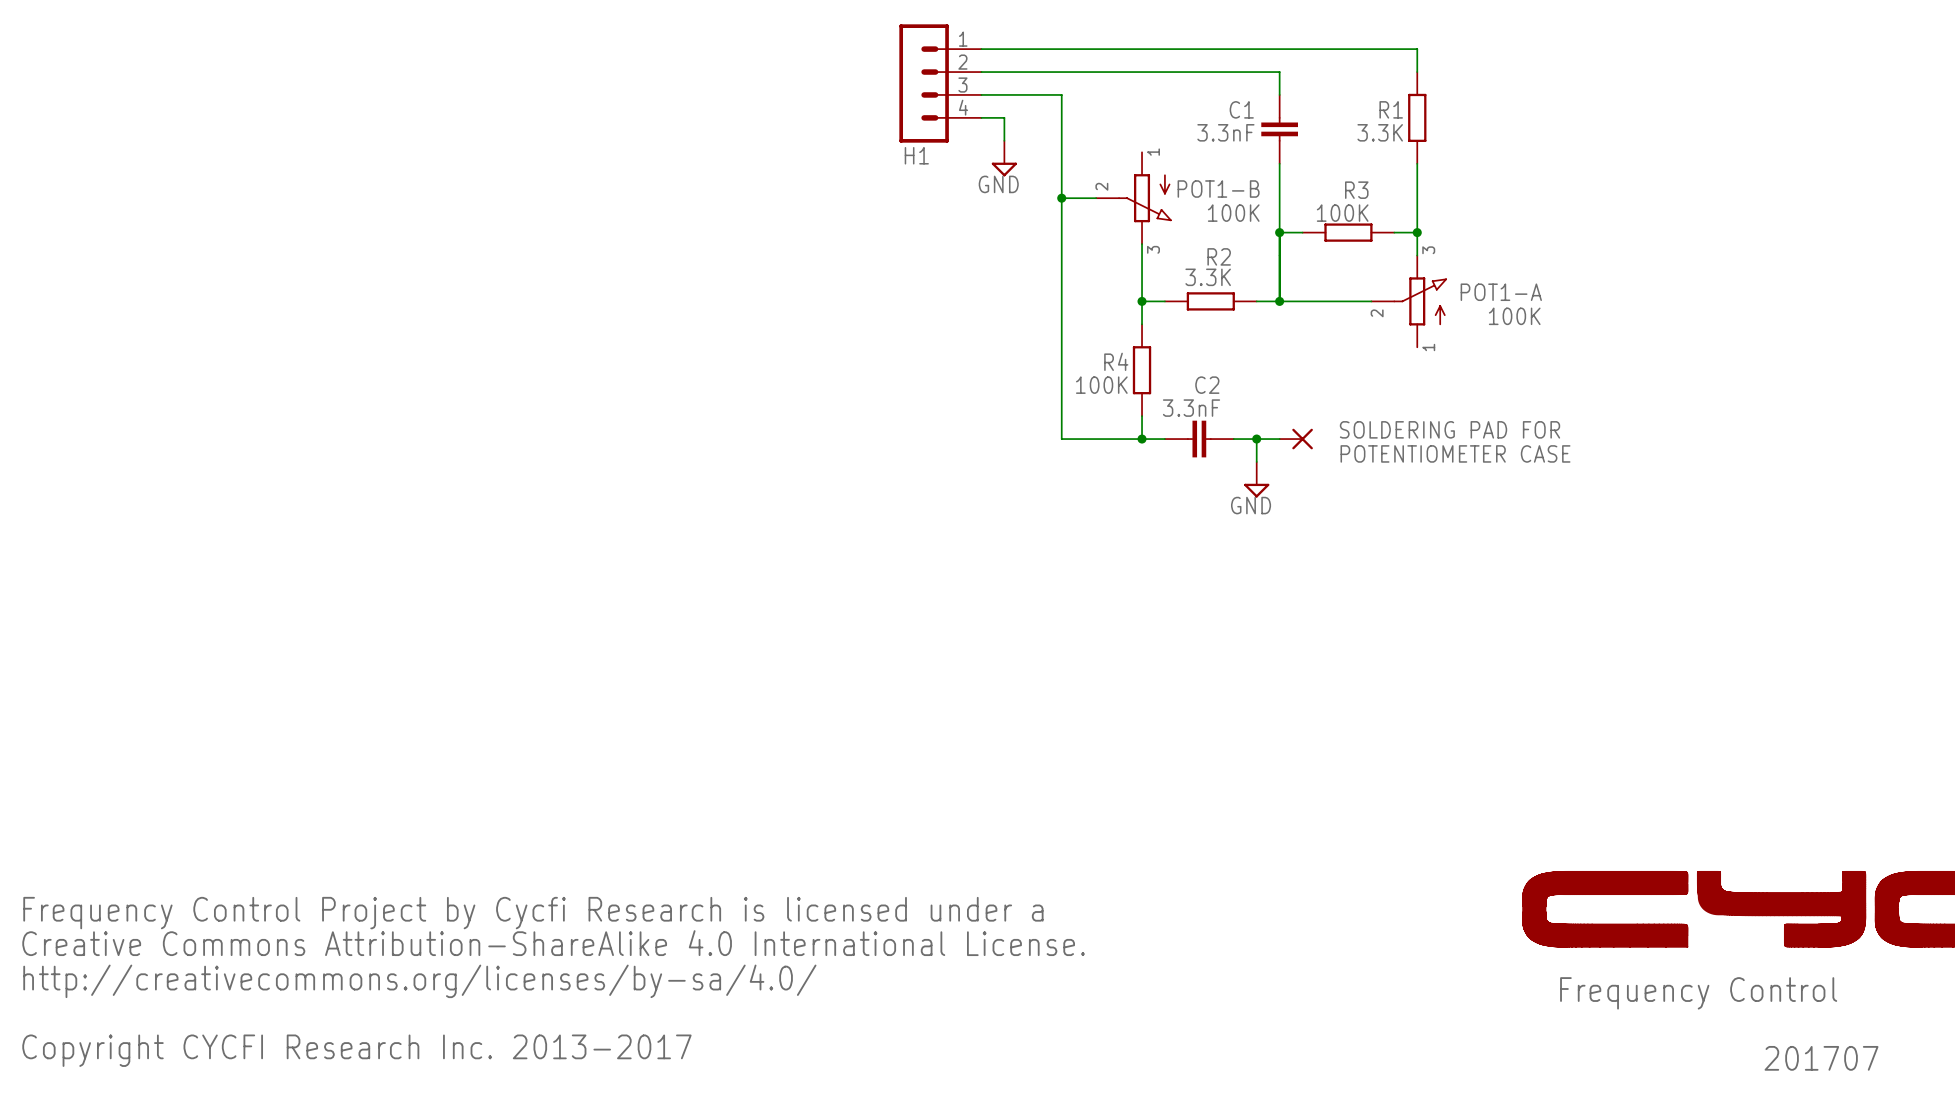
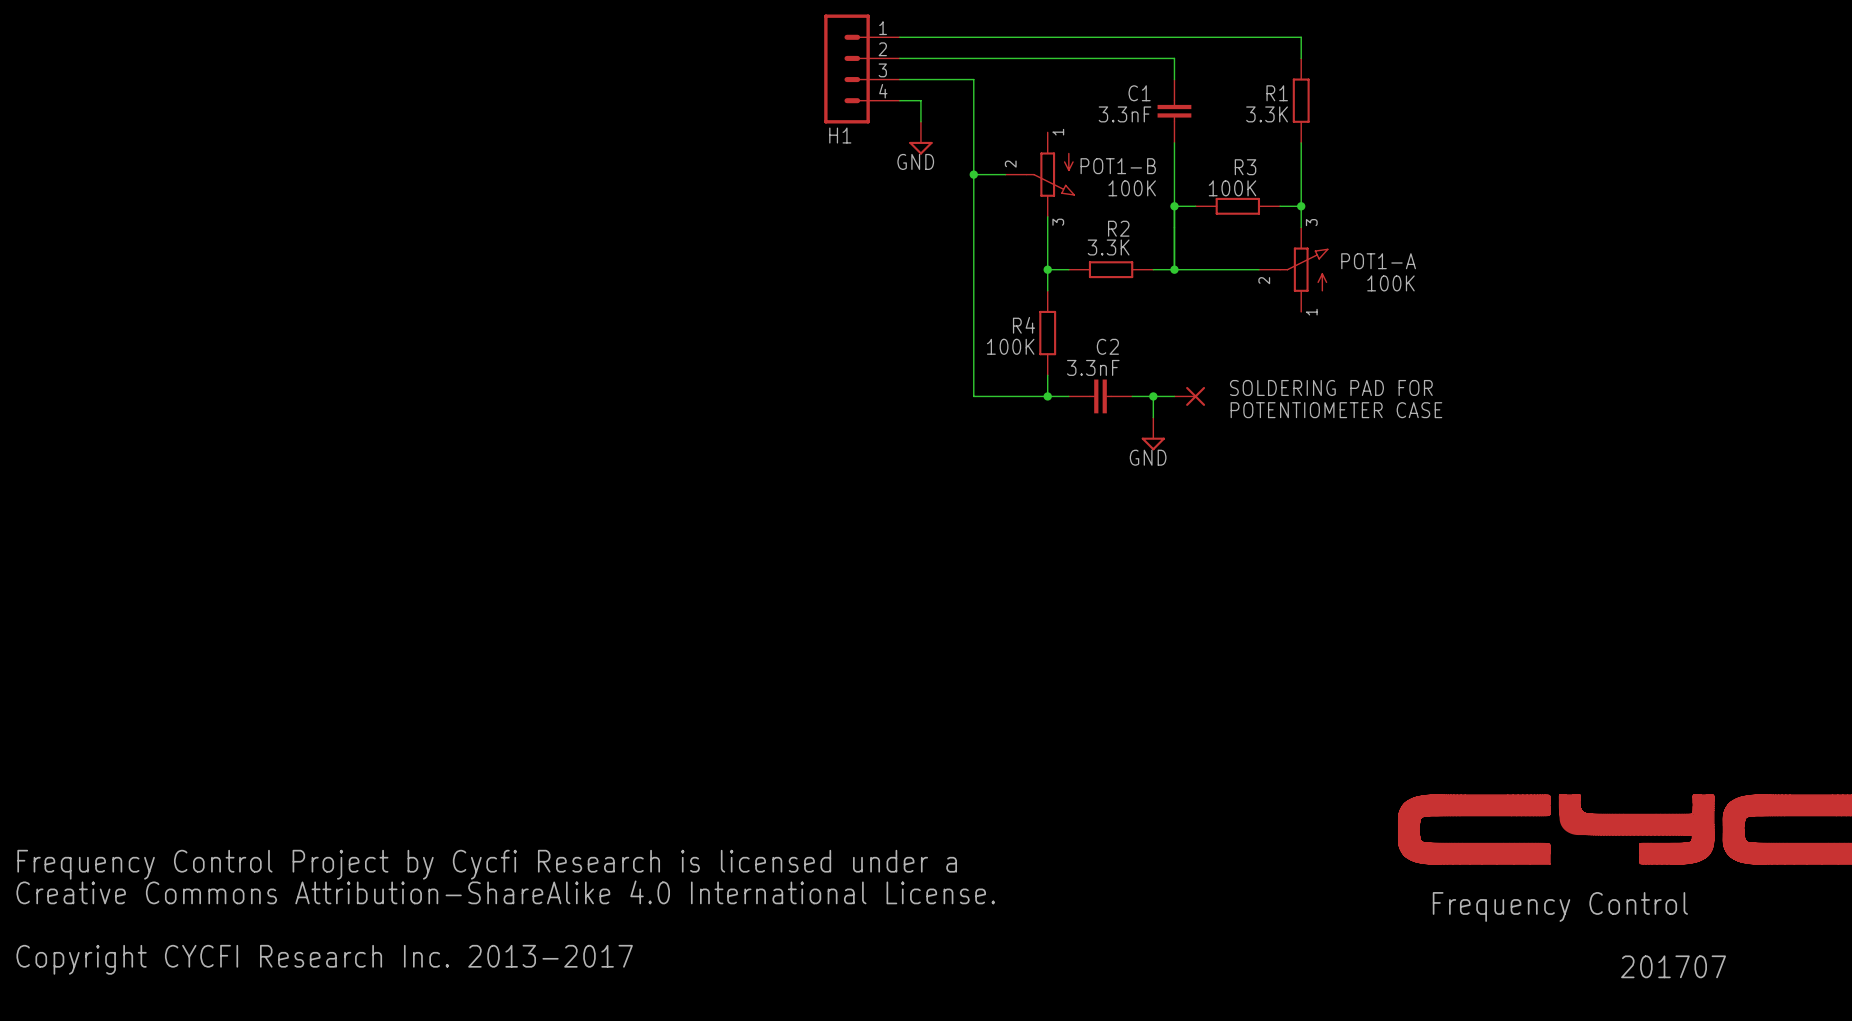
text: Frequency Control Project by Cycfi Research is licensed under a (533, 913) -> none
text: Creative Commons Attribution-ShareAlike 4.0 International License. (553, 943) -> Frequency Control Project by Cycfi Research is licensed under a (487, 864)
text: http://creativecommons.org/licenses/by-sa/4.0/ (419, 981) -> Creative Commons Attribution-ShareAlike 4.0 International License. (505, 892)

